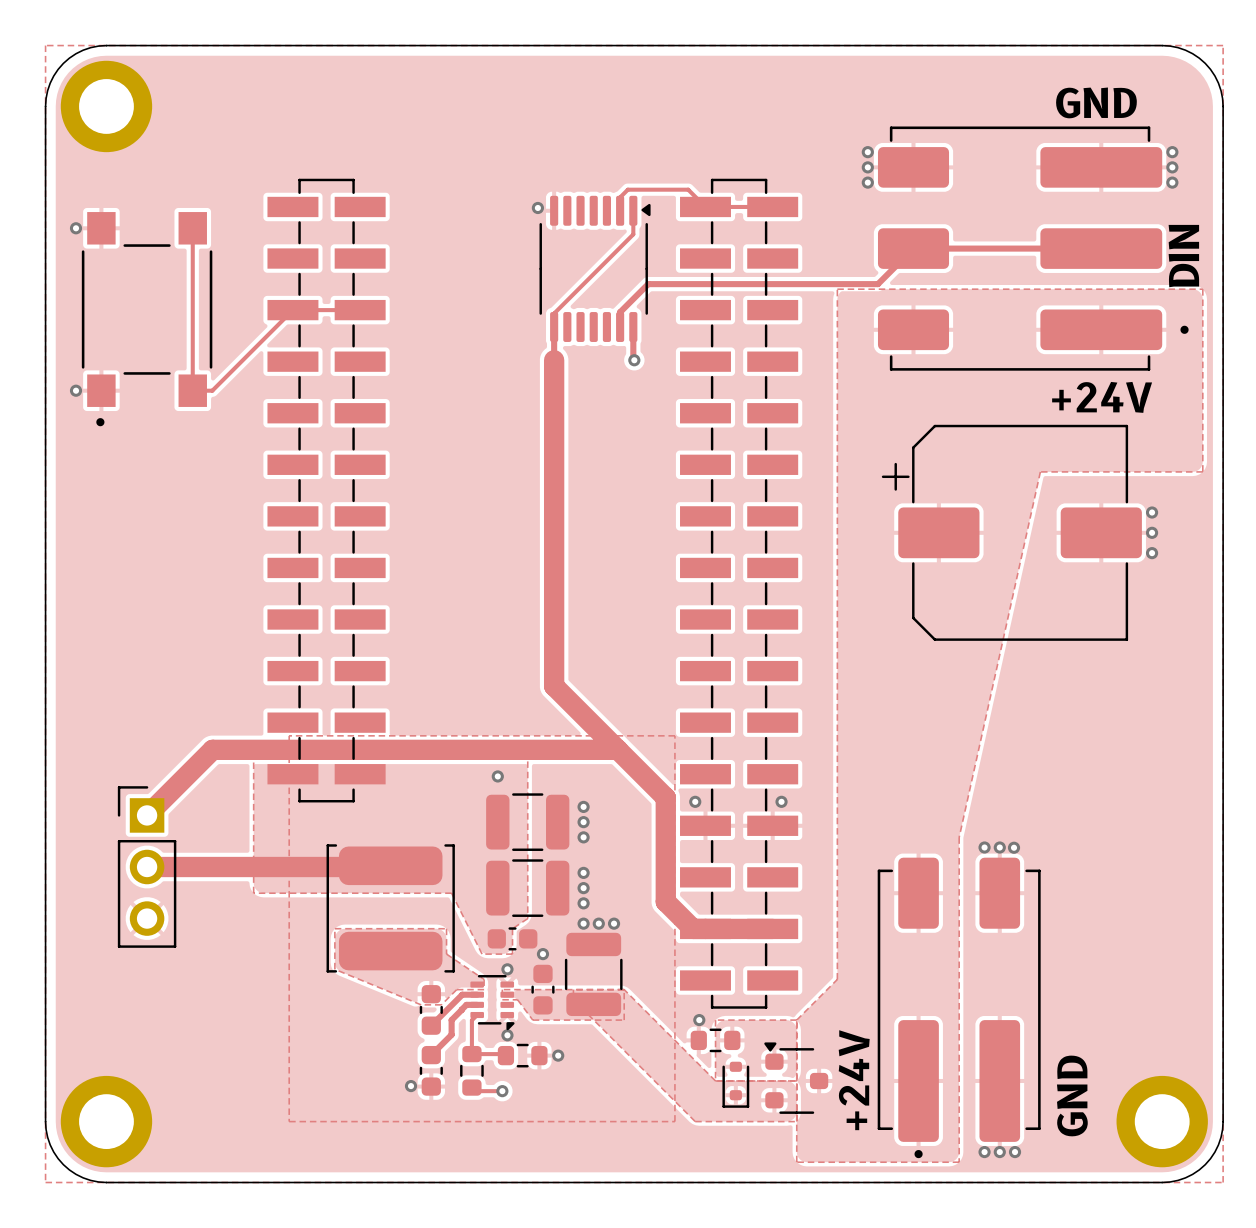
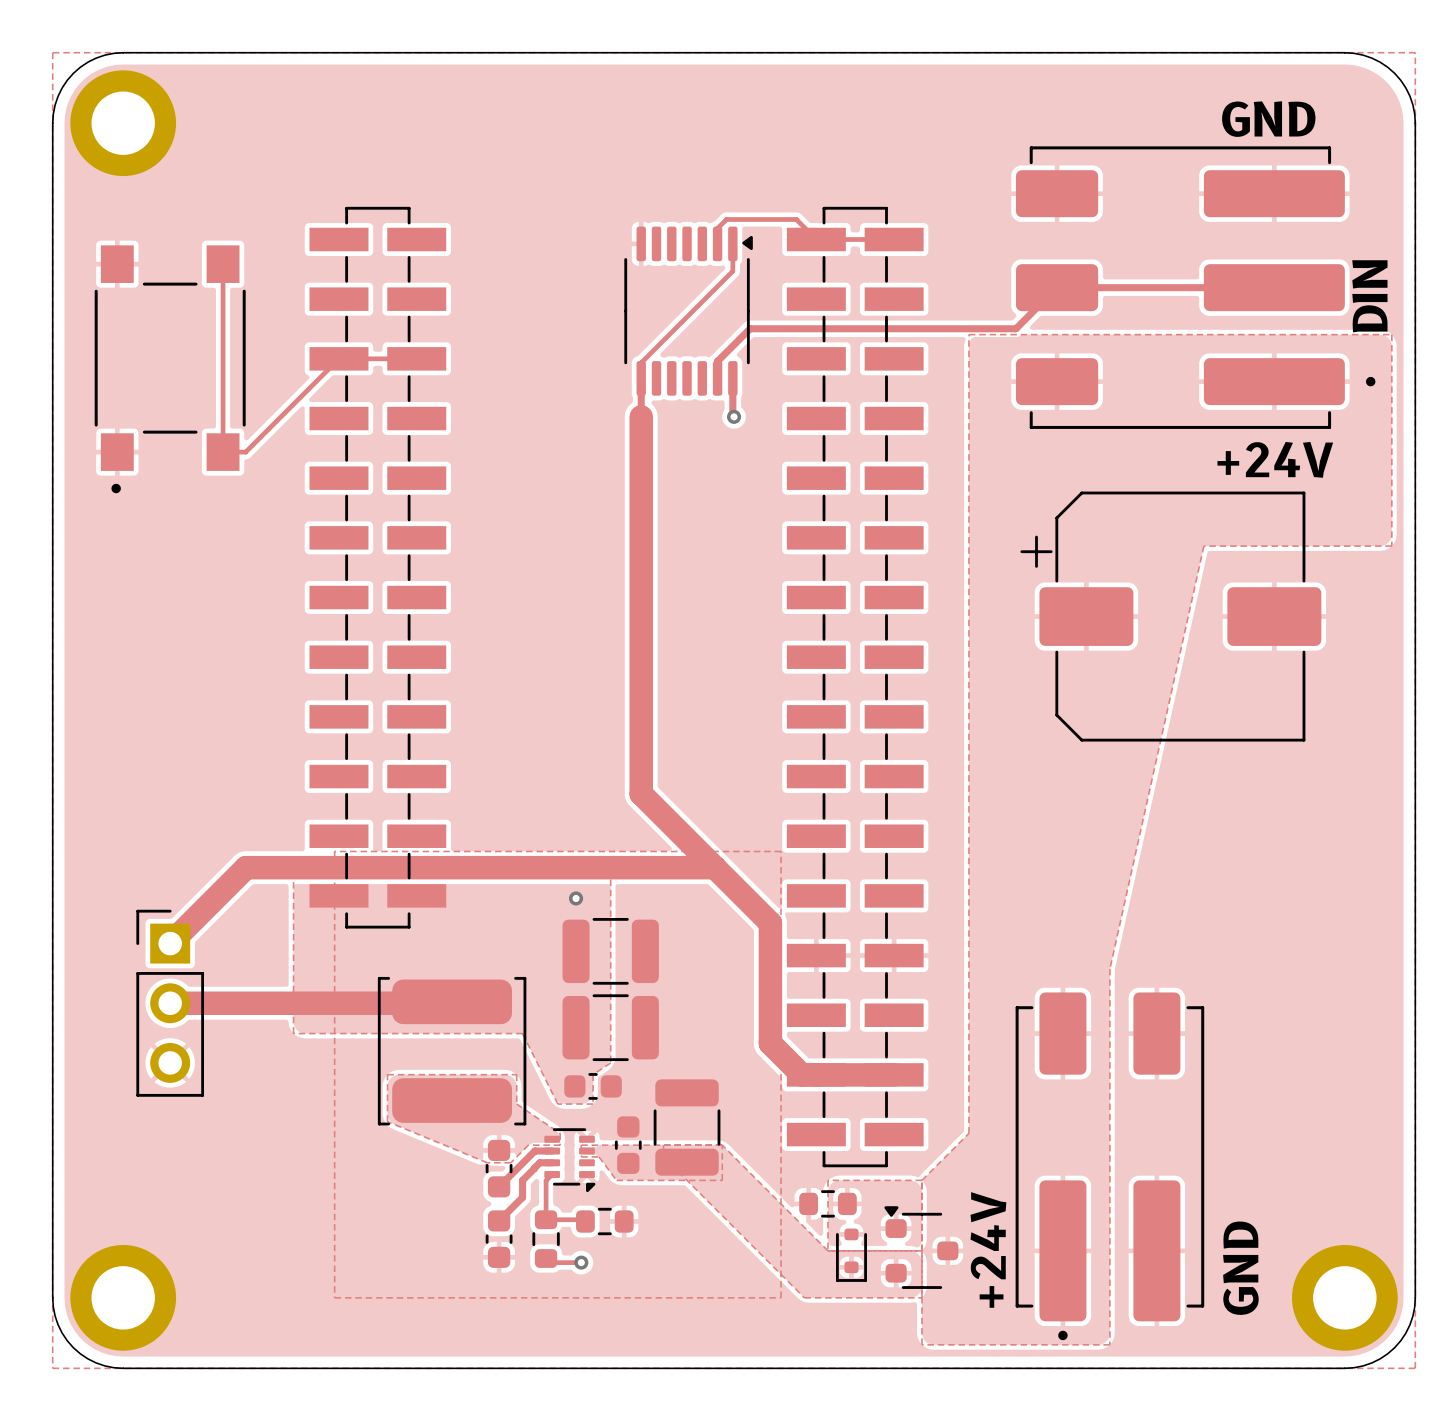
via: (867, 152) -> none
via: (1172, 152) -> none
via: (867, 167) -> none
via: (1172, 167) -> none
via: (867, 182) -> none
via: (1172, 182) -> none
via: (537, 207) -> none
via: (76, 228) -> none
via: (76, 390) -> none
via: (1152, 512) -> none
via: (1152, 532) -> none
via: (1152, 553) -> none
via: (695, 801) -> none
via: (781, 801) -> none
via: (583, 806) -> none
via: (583, 822) -> none
via: (583, 837) -> none
via: (984, 847) -> none
via: (999, 847) -> none
via: (1014, 847) -> none
via: (583, 872) -> none
via: (583, 888) -> none
via: (583, 903) -> none
via: (583, 923) -> none
via: (598, 923) -> none
via: (614, 923) -> none
via: (542, 954) -> none
via: (507, 969) -> none
via: (699, 1020) -> none
via: (507, 1035) -> none
via: (558, 1055) -> none
via: (411, 1086) -> none
via: (984, 1152) -> none
via: (999, 1152) -> none
via: (1015, 1152) -> none

